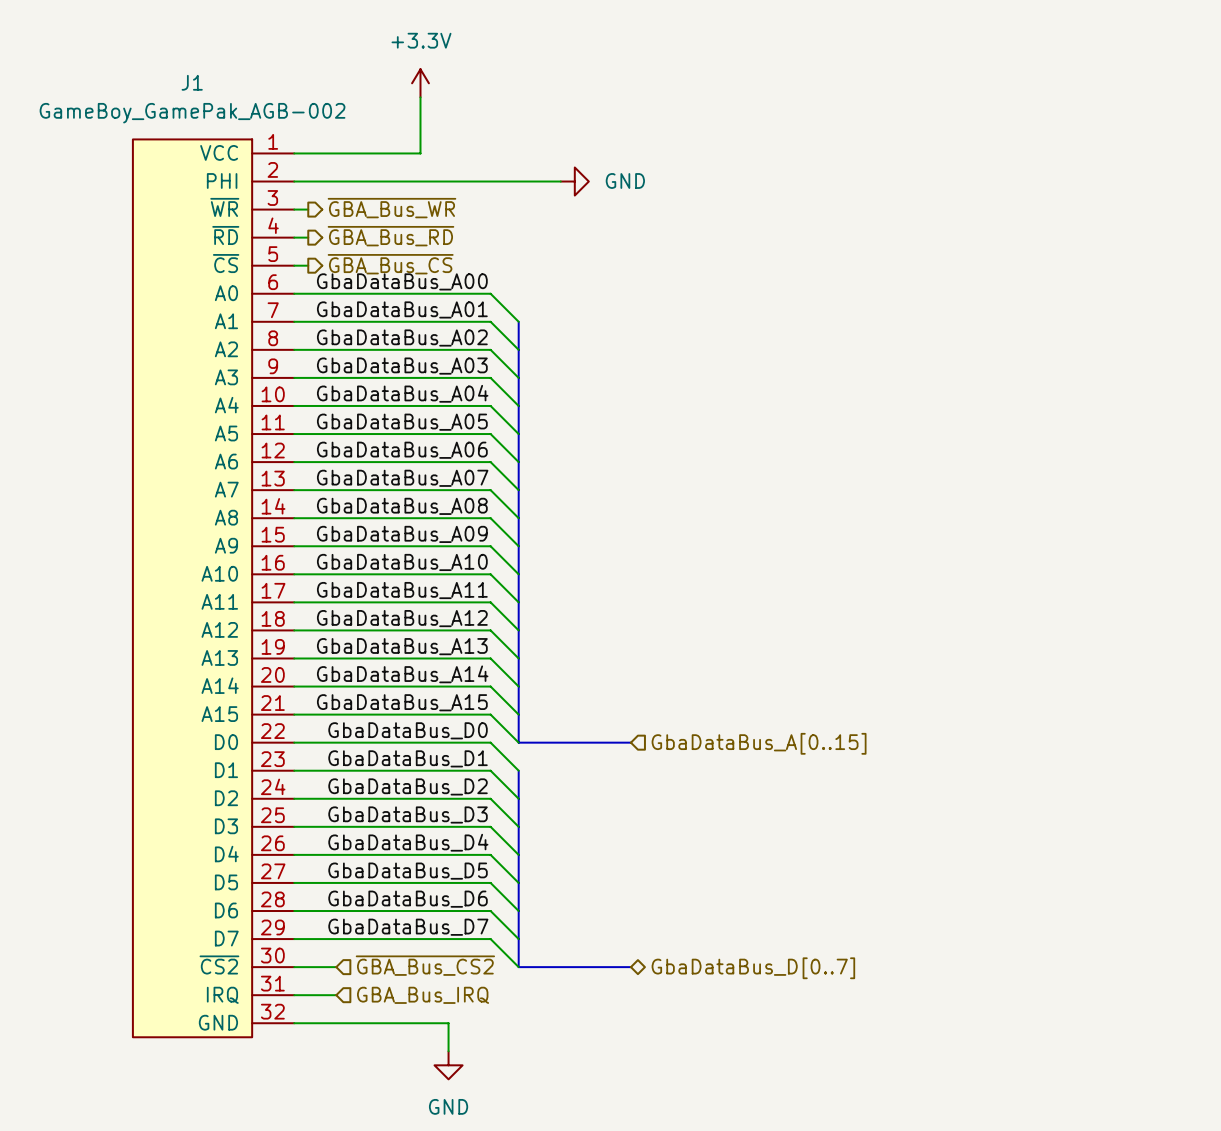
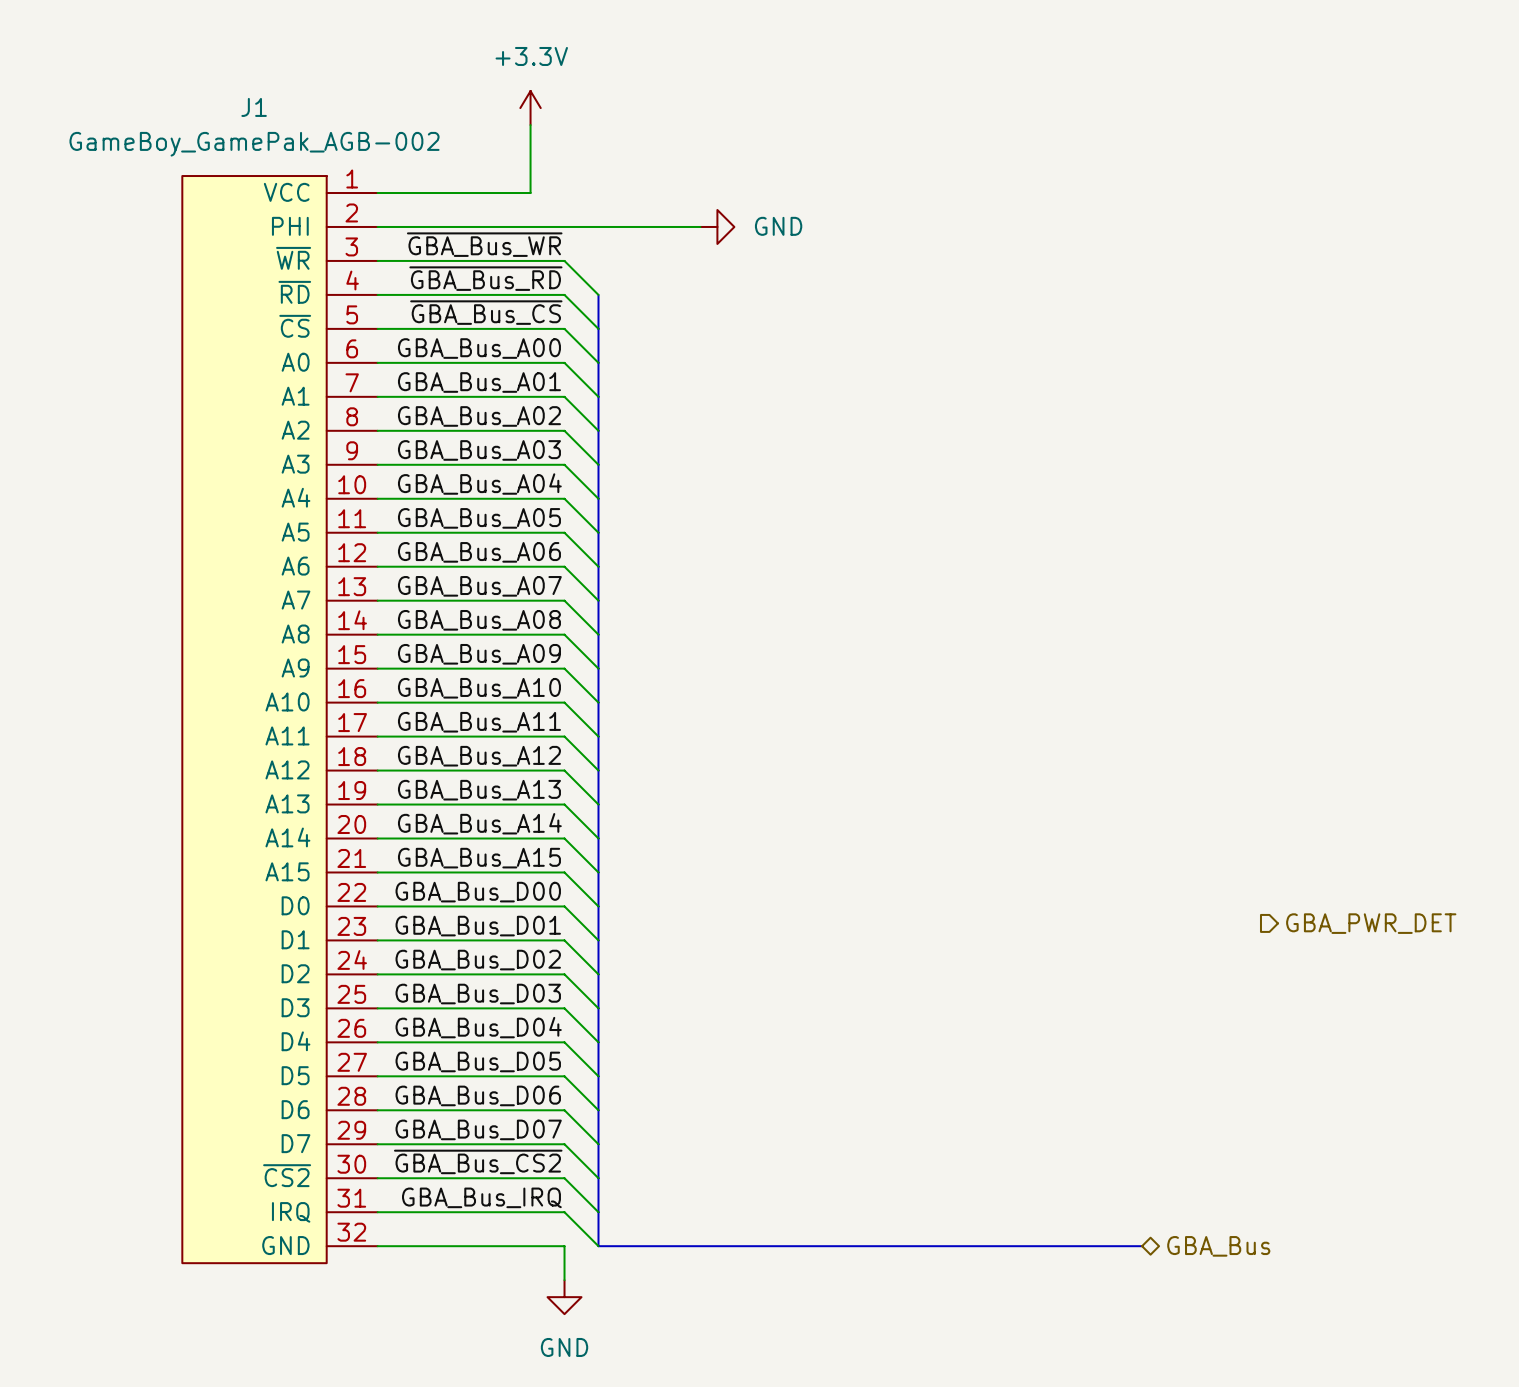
label: none -> ~{GBA_Bus_WR} (484, 244)
hierarchical label: ~{GBA_Bus_WR} (391, 208) -> none
wire: none -> (394, 260) (564, 260) (598, 294)
label: none -> ~{GBA_Bus_RD} (485, 278)
hierarchical label: ~{GBA_Bus_RD} (390, 236) -> none
wire: none -> (394, 294) (564, 294) (598, 328)
bus: none -> (598, 294) (598, 1246) (1142, 1246)
label: none -> ~{GBA_Bus_CS} (486, 312)
hierarchical label: ~{GBA_Bus_CS} (390, 264) -> none
wire: none -> (394, 328) (564, 328) (598, 362)
label: GbaDataBus_A00 (402, 281) -> GBA_Bus_A00 (479, 348)
wire: (448, 293) (490, 293) (518, 321) -> (564, 362) (598, 396)
label: GbaDataBus_A01 (402, 309) -> GBA_Bus_A01 (479, 382)
wire: (448, 321) (490, 321) (518, 349) -> (564, 396) (598, 430)
bus: (518, 321) (518, 742) (630, 742) -> none
label: GbaDataBus_A02 (402, 338) -> GBA_Bus_A02 (479, 416)
wire: (448, 349) (490, 349) (518, 377) -> (564, 430) (598, 464)
label: GbaDataBus_A03 (402, 366) -> GBA_Bus_A03 (479, 450)
wire: (448, 377) (490, 377) (518, 405) -> (564, 464) (598, 498)
label: GbaDataBus_A04 (402, 393) -> GBA_Bus_A04 (479, 484)
wire: (448, 405) (490, 405) (518, 434) -> (564, 498) (598, 532)
label: GbaDataBus_A05 (402, 422) -> GBA_Bus_A05 (479, 518)
wire: (448, 434) (490, 434) (518, 462) -> (564, 532) (598, 566)
label: GbaDataBus_A06 (402, 450) -> GBA_Bus_A06 (479, 552)
wire: (448, 462) (490, 462) (518, 490) -> (564, 566) (598, 600)
label: GbaDataBus_A07 (402, 478) -> GBA_Bus_A07 (479, 586)
wire: (448, 490) (490, 490) (518, 518) -> (564, 600) (598, 634)
label: GbaDataBus_A08 (402, 506) -> GBA_Bus_A08 (479, 620)
wire: (448, 518) (490, 518) (518, 546) -> (564, 634) (598, 668)
label: GbaDataBus_A09 (402, 534) -> GBA_Bus_A09 (479, 654)
wire: (448, 546) (490, 546) (518, 574) -> (564, 668) (598, 702)
label: GbaDataBus_A10 (402, 562) -> GBA_Bus_A10 (479, 688)
wire: (448, 574) (490, 574) (518, 602) -> (564, 702) (598, 736)
label: GbaDataBus_A11 (402, 590) -> GBA_Bus_A11 (479, 722)
wire: (448, 602) (490, 602) (518, 630) -> (564, 736) (598, 770)
label: GbaDataBus_A12 (402, 618) -> GBA_Bus_A12 (479, 756)
wire: (448, 630) (490, 630) (518, 658) -> (564, 770) (598, 804)
label: GbaDataBus_A13 (402, 646) -> GBA_Bus_A13 (479, 790)
wire: (448, 658) (490, 658) (518, 686) -> (564, 804) (598, 838)
label: GbaDataBus_A14 (402, 674) -> GBA_Bus_A14 (479, 823)
wire: (448, 686) (490, 686) (518, 714) -> (564, 838) (598, 872)
label: GbaDataBus_A15 (402, 702) -> GBA_Bus_A15 (479, 858)
wire: (448, 714) (490, 714) (518, 742) -> (564, 872) (598, 906)
label: none -> GBA_Bus_D00 (478, 892)
label: GbaDataBus_D0 (408, 730) -> none
wire: (448, 742) (490, 742) (518, 770) -> (564, 906) (598, 940)
hierarchical label: GbaDataBus_A[0..15] (759, 743) -> none
hierarchical label: none -> GBA_PWR_DET (1371, 923)
label: none -> GBA_Bus_D01 (478, 926)
label: GbaDataBus_D1 (408, 758) -> none
wire: (448, 770) (490, 770) (518, 798) -> (564, 940) (598, 974)
bus: (518, 770) (518, 967) (630, 967) -> none
label: none -> GBA_Bus_D02 (478, 960)
label: GbaDataBus_D2 (408, 786) -> none
wire: (448, 798) (490, 798) (518, 826) -> (564, 974) (598, 1008)
label: none -> GBA_Bus_D03 (478, 994)
label: GbaDataBus_D3 (408, 814) -> none
wire: (448, 826) (490, 826) (518, 854) -> (564, 1008) (598, 1042)
label: none -> GBA_Bus_D04 (478, 1027)
label: GbaDataBus_D4 (408, 842) -> none
wire: (448, 854) (490, 854) (518, 882) -> (564, 1042) (598, 1076)
label: none -> GBA_Bus_D05 (478, 1061)
label: GbaDataBus_D5 (408, 871) -> none
wire: (448, 882) (490, 882) (518, 911) -> (564, 1076) (598, 1110)
label: none -> GBA_Bus_D06 (478, 1095)
label: GbaDataBus_D6 (408, 899) -> none
wire: (448, 911) (490, 911) (518, 939) -> (564, 1110) (598, 1144)
label: none -> GBA_Bus_D07 (478, 1129)
label: GbaDataBus_D7 (408, 927) -> none
wire: (448, 939) (490, 939) (518, 967) -> (564, 1144) (598, 1178)
label: none -> ~{GBA_Bus_CS2} (478, 1161)
hierarchical label: ~{GBA_Bus_CS2} (425, 965) -> none
wire: none -> (428, 1178) (564, 1178) (598, 1212)
hierarchical label: GbaDataBus_D[0..7] (753, 968) -> none
label: none -> GBA_Bus_IRQ (481, 1197)
wire: none -> (428, 1212) (564, 1212) (598, 1246)
hierarchical label: GBA_Bus_IRQ (423, 995) -> none
hierarchical label: none -> GBA_Bus (1218, 1246)

